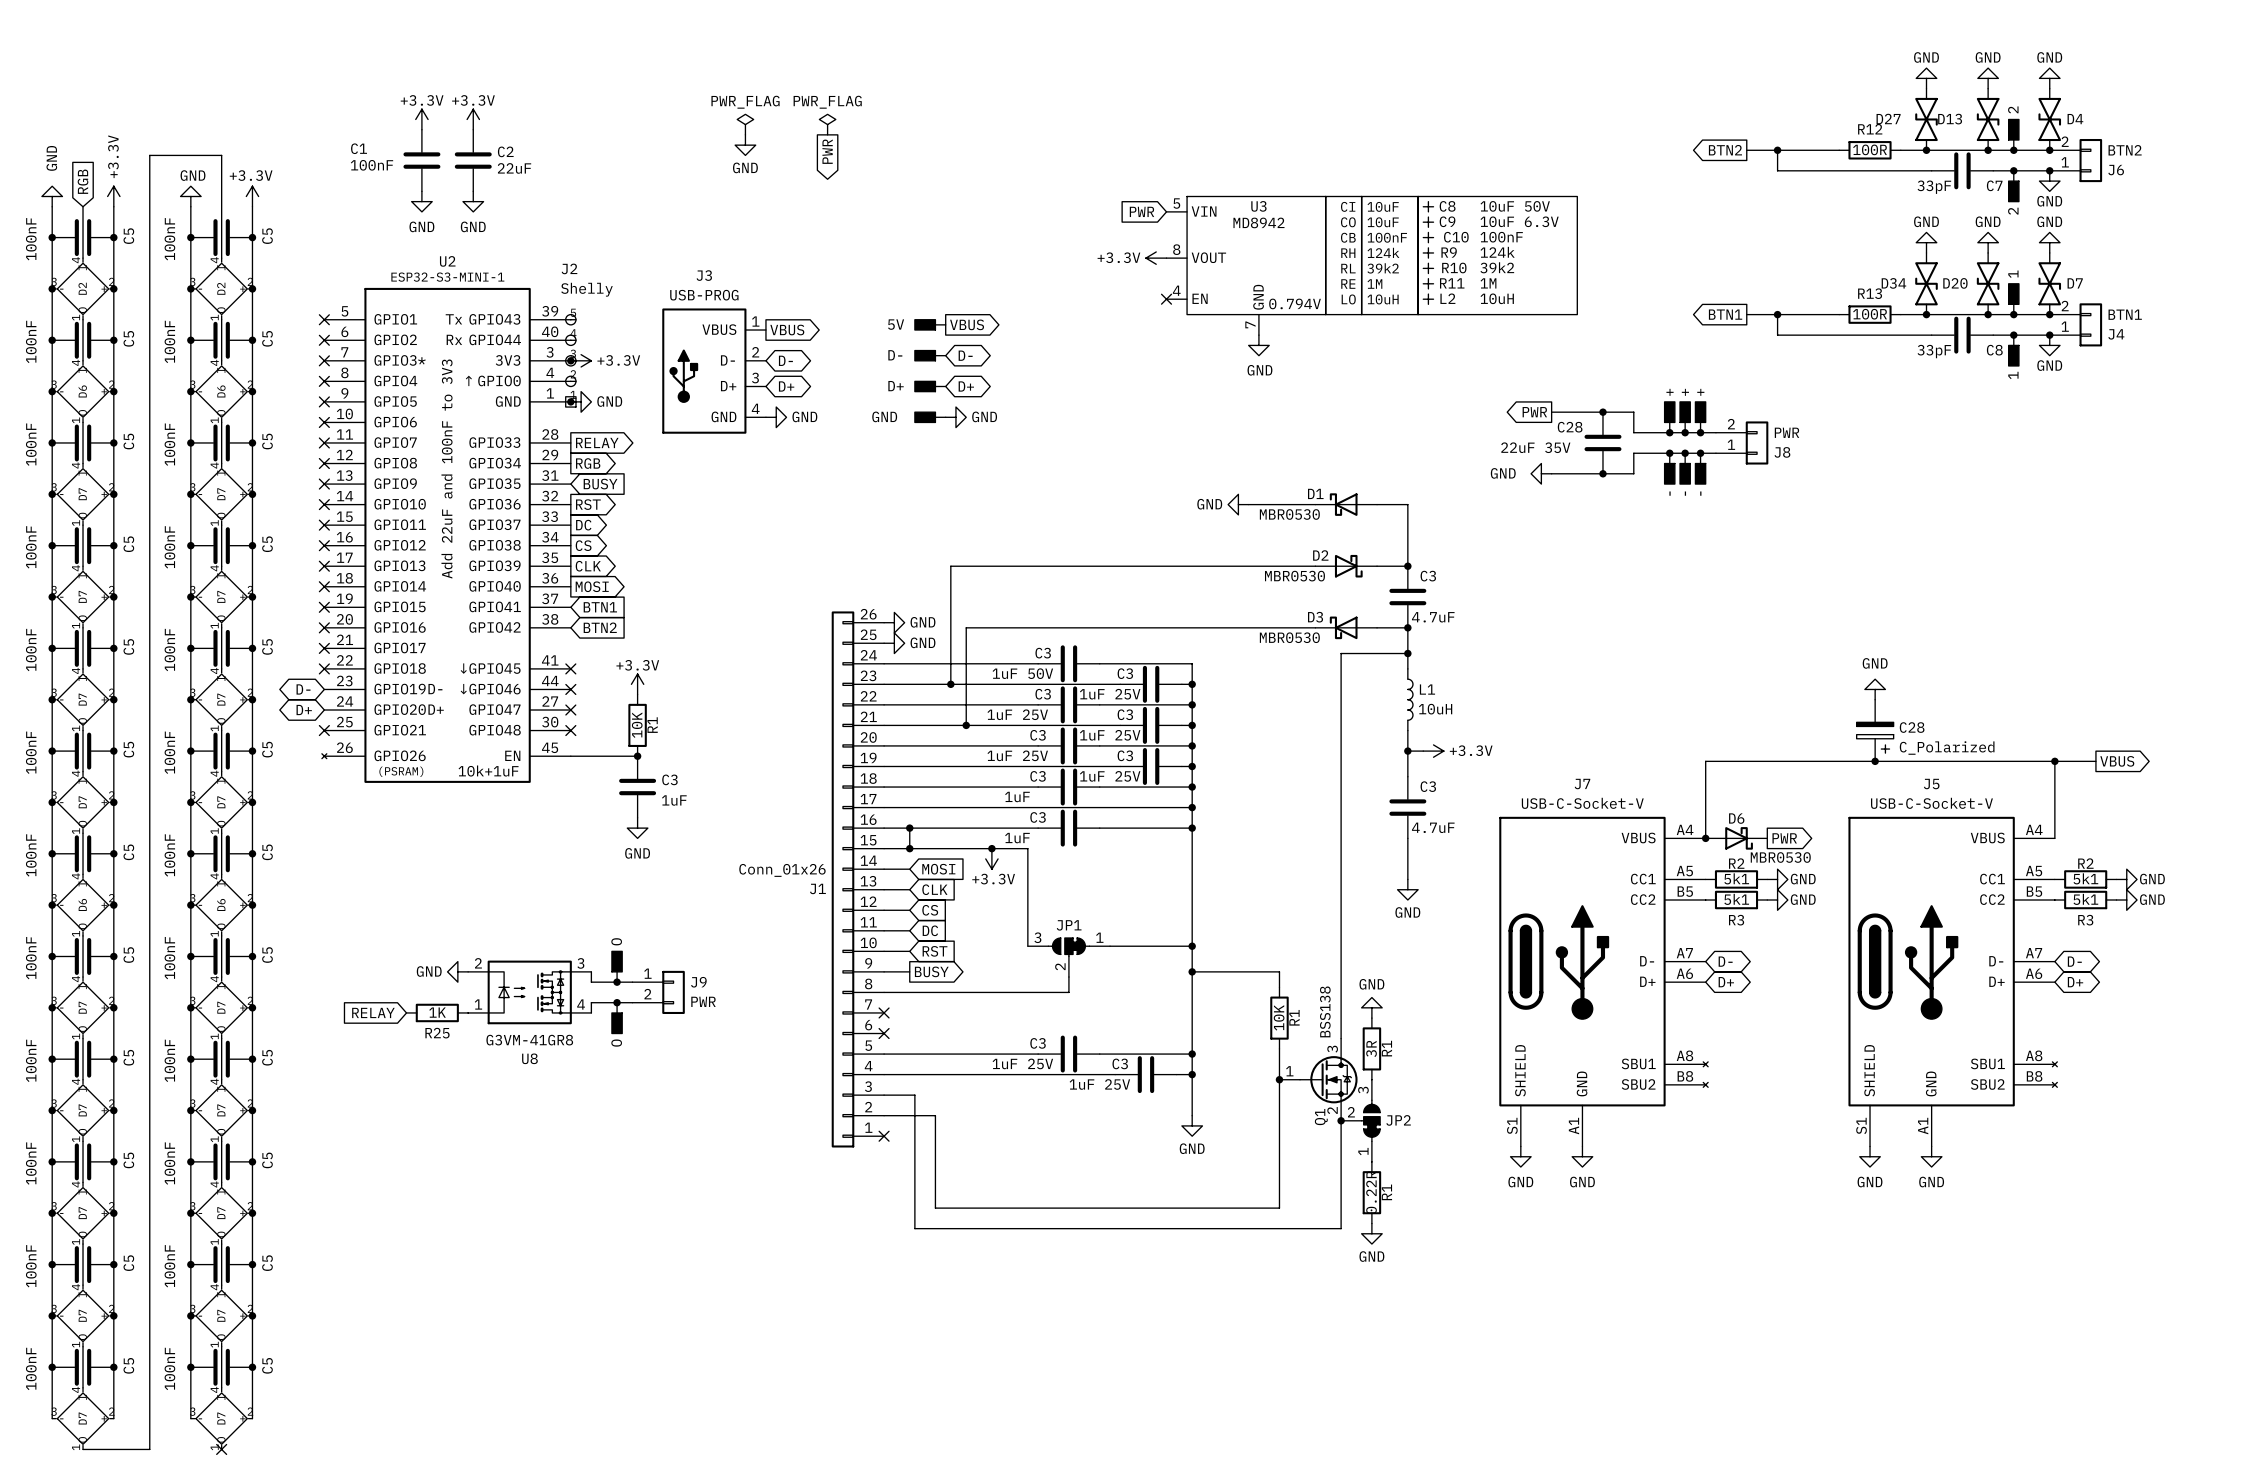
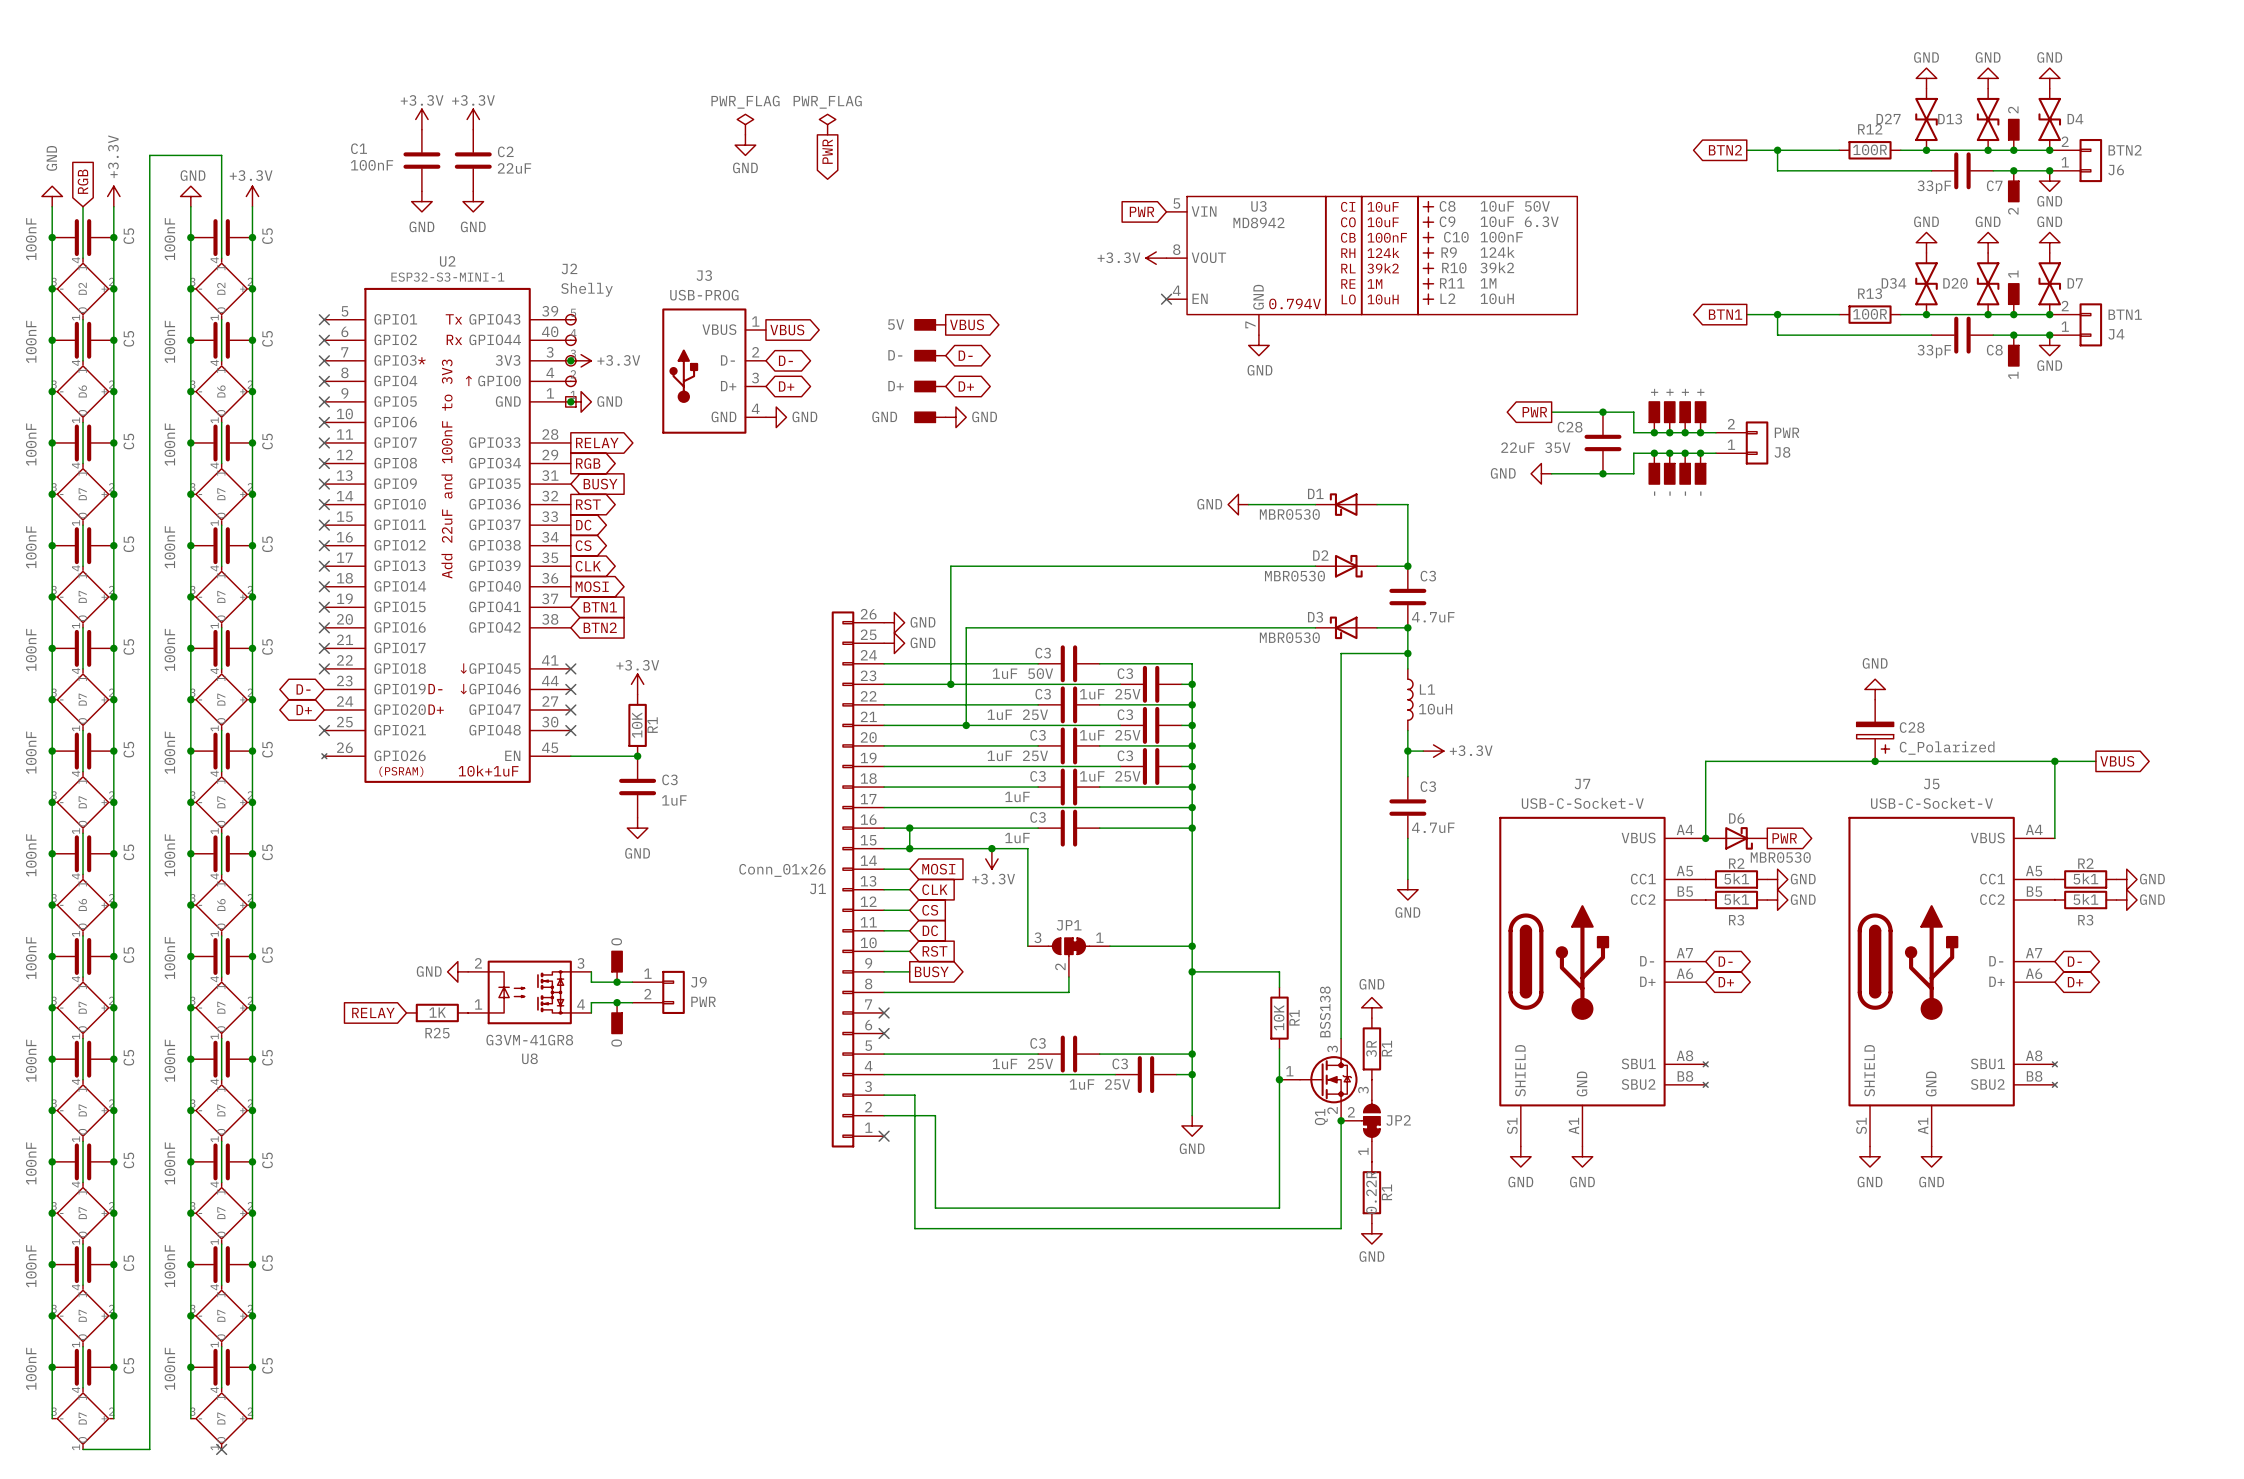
part: none -> + (1654, 416)
junction: none -> (1654, 432)
junction: none -> (1654, 453)
part: none -> - (1654, 468)

